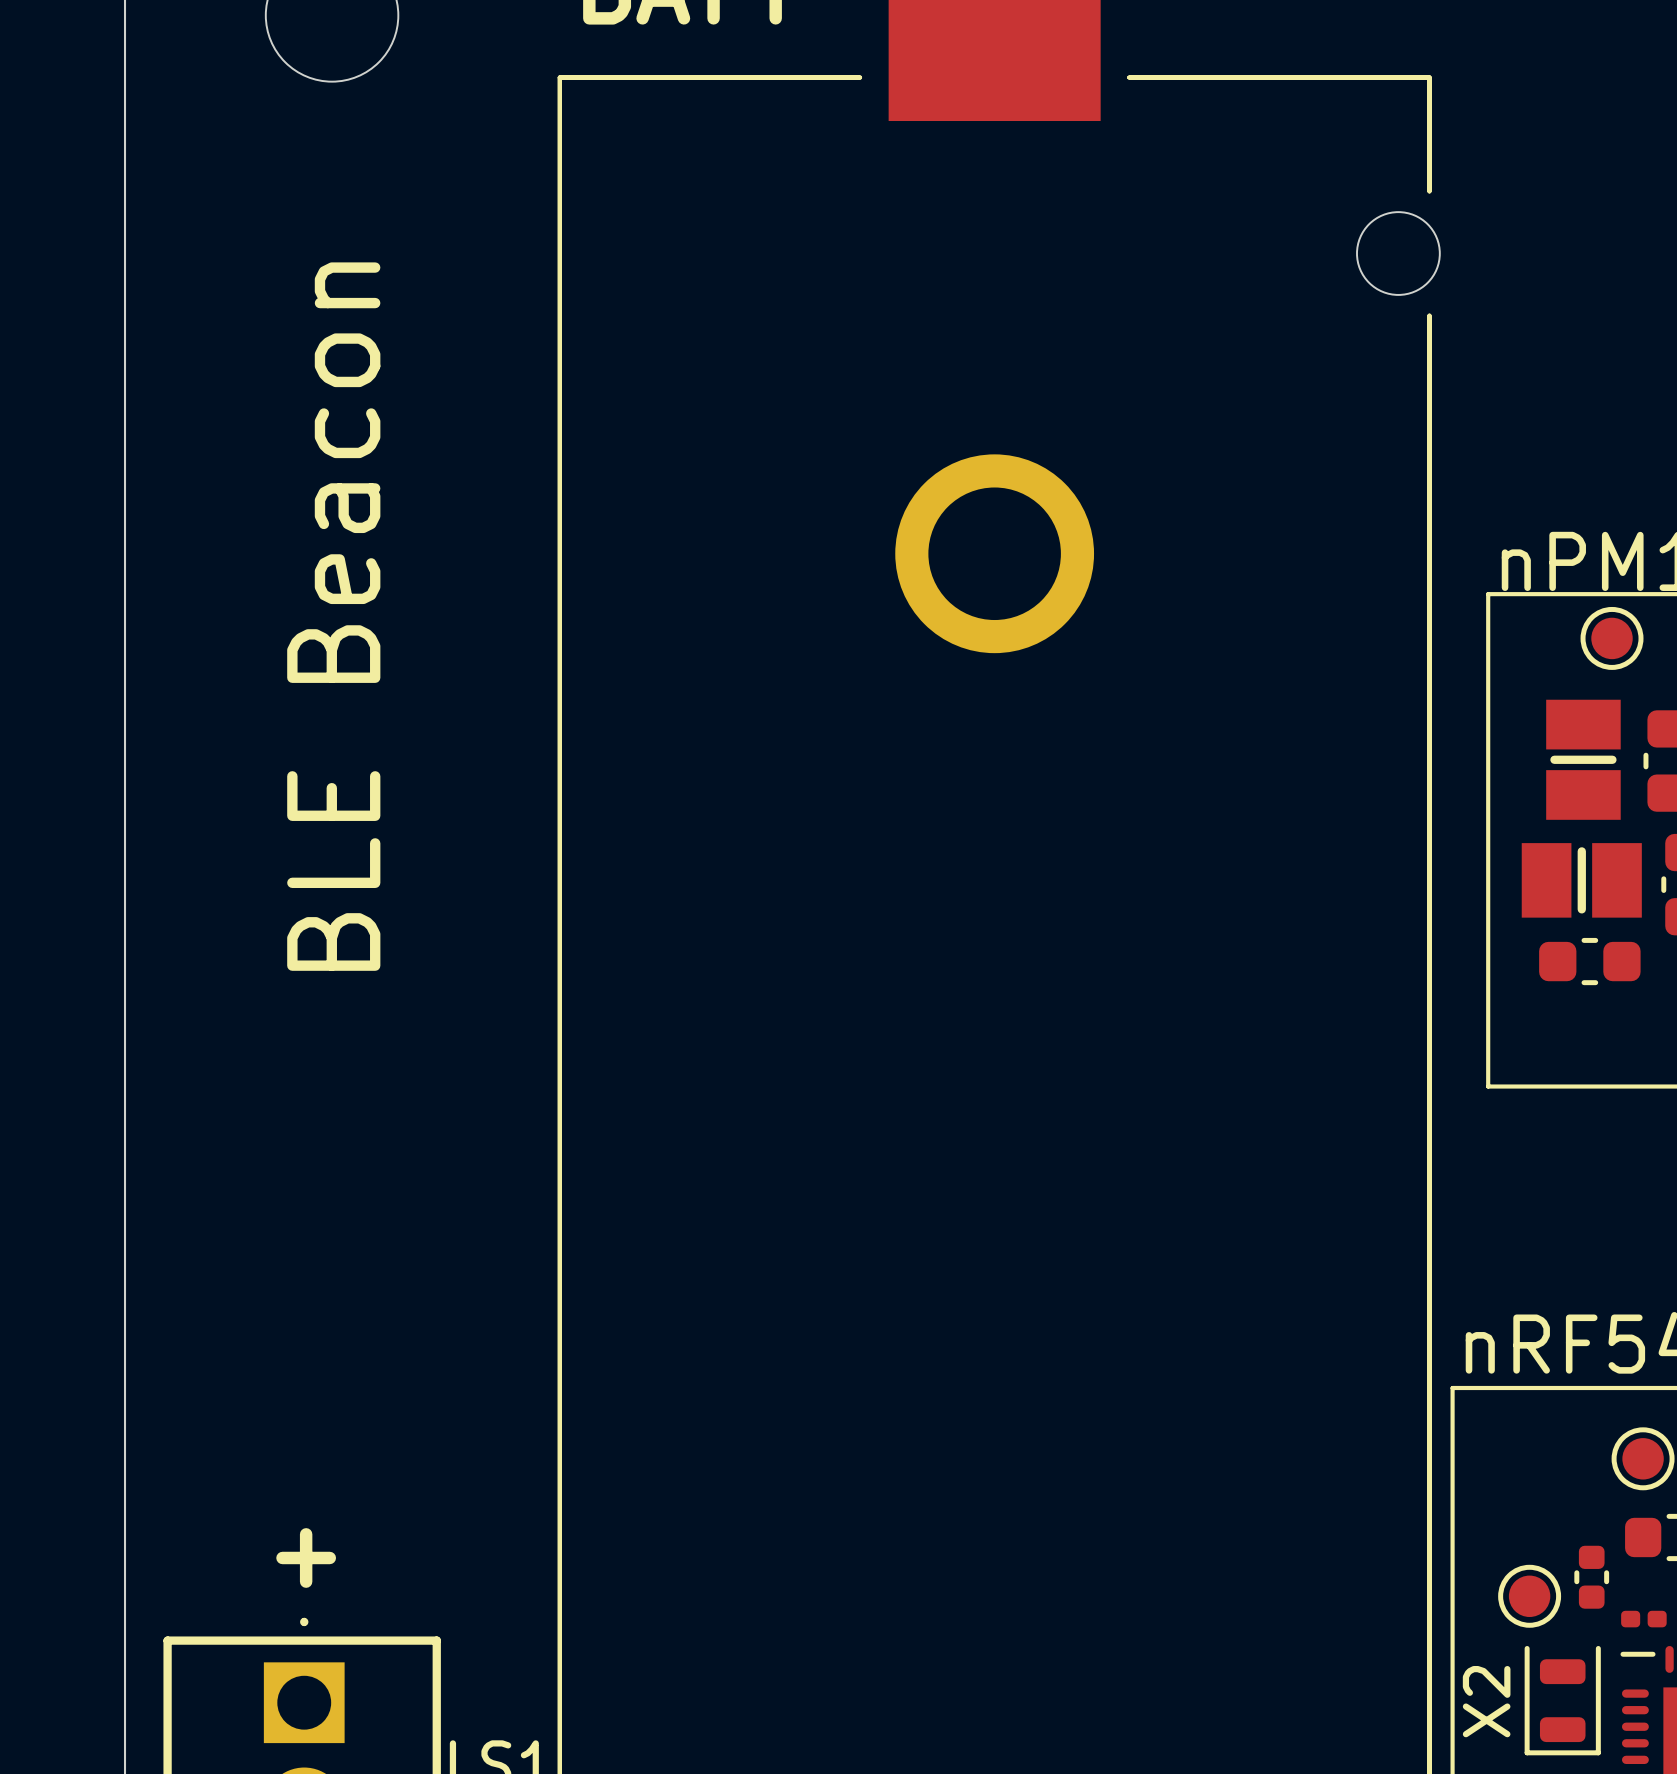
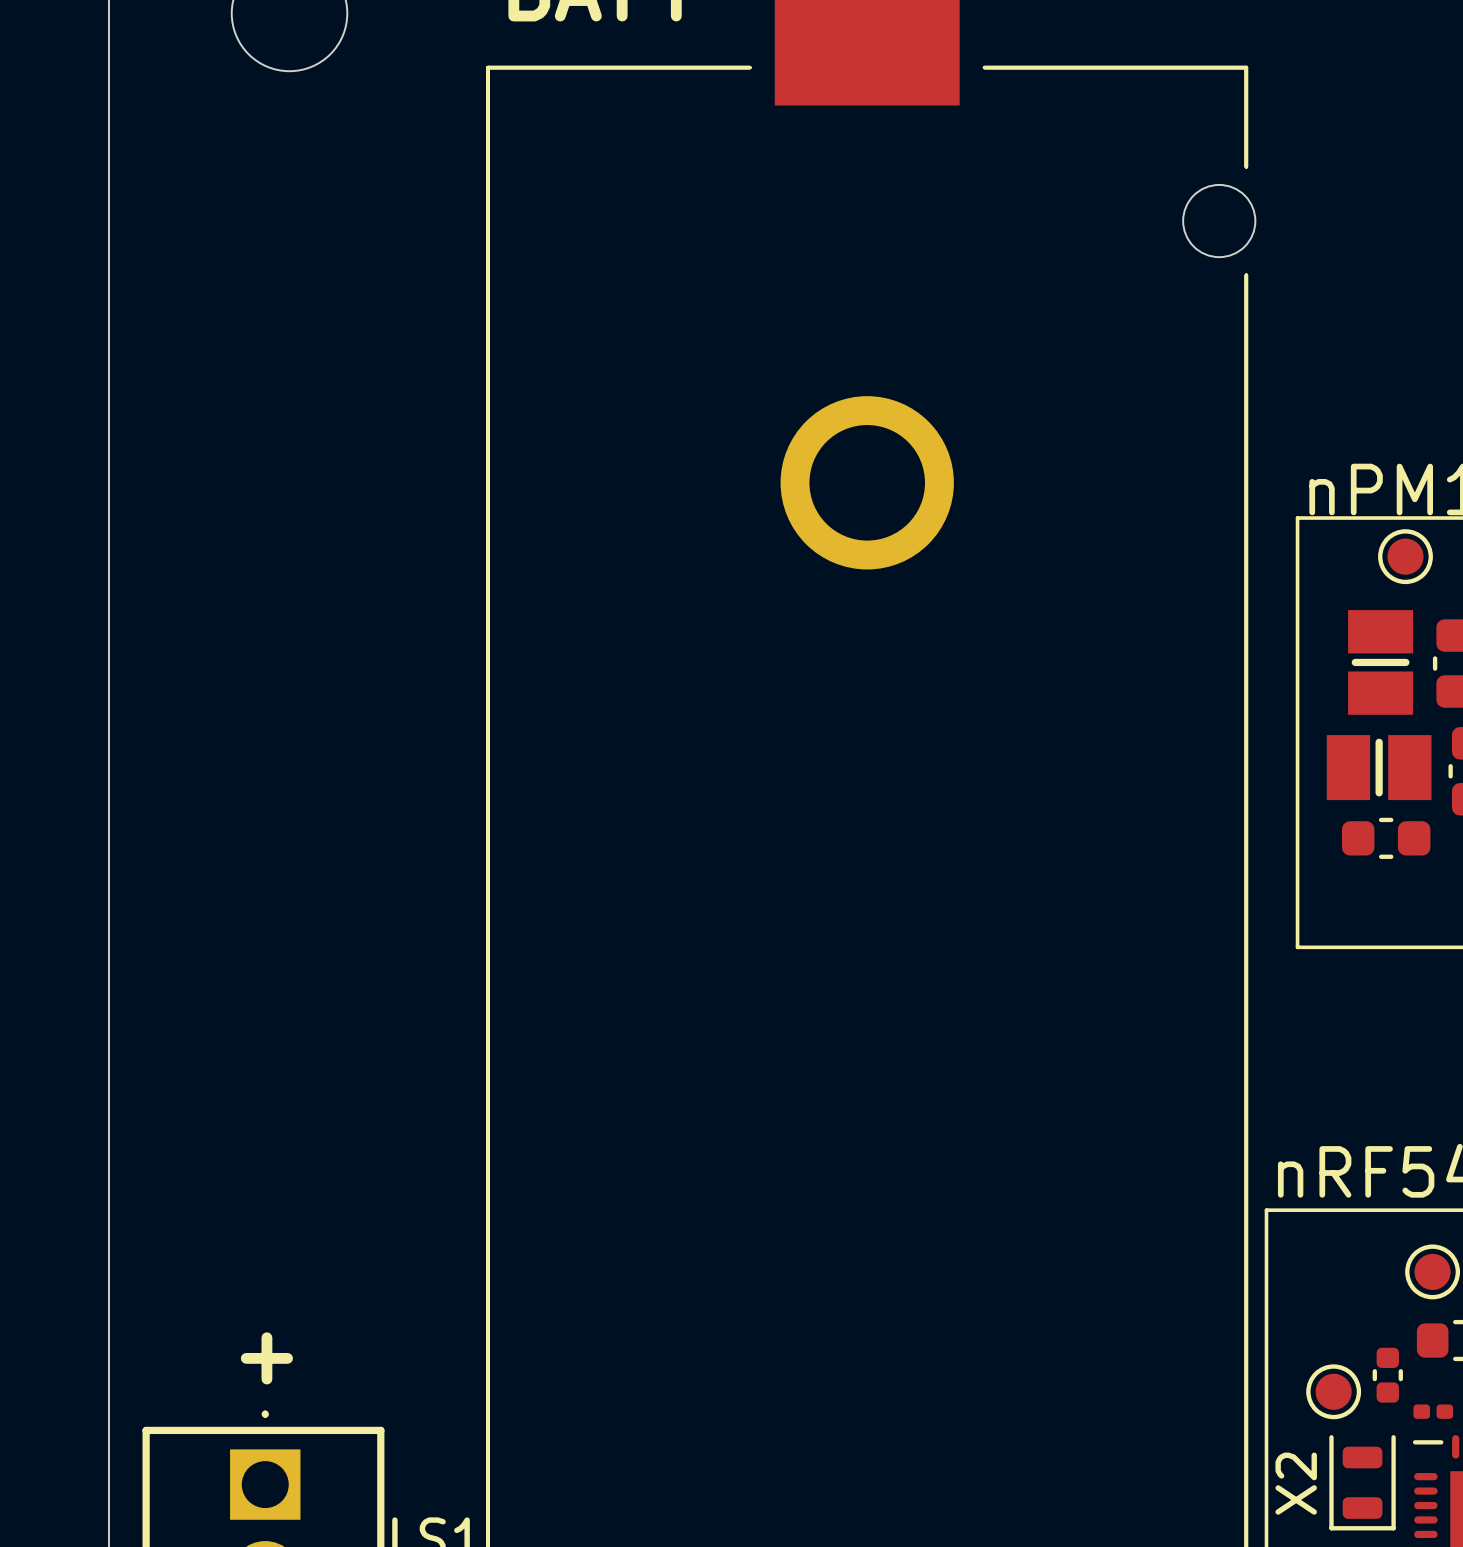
text: BLE Beacon (333, 616) -> none

